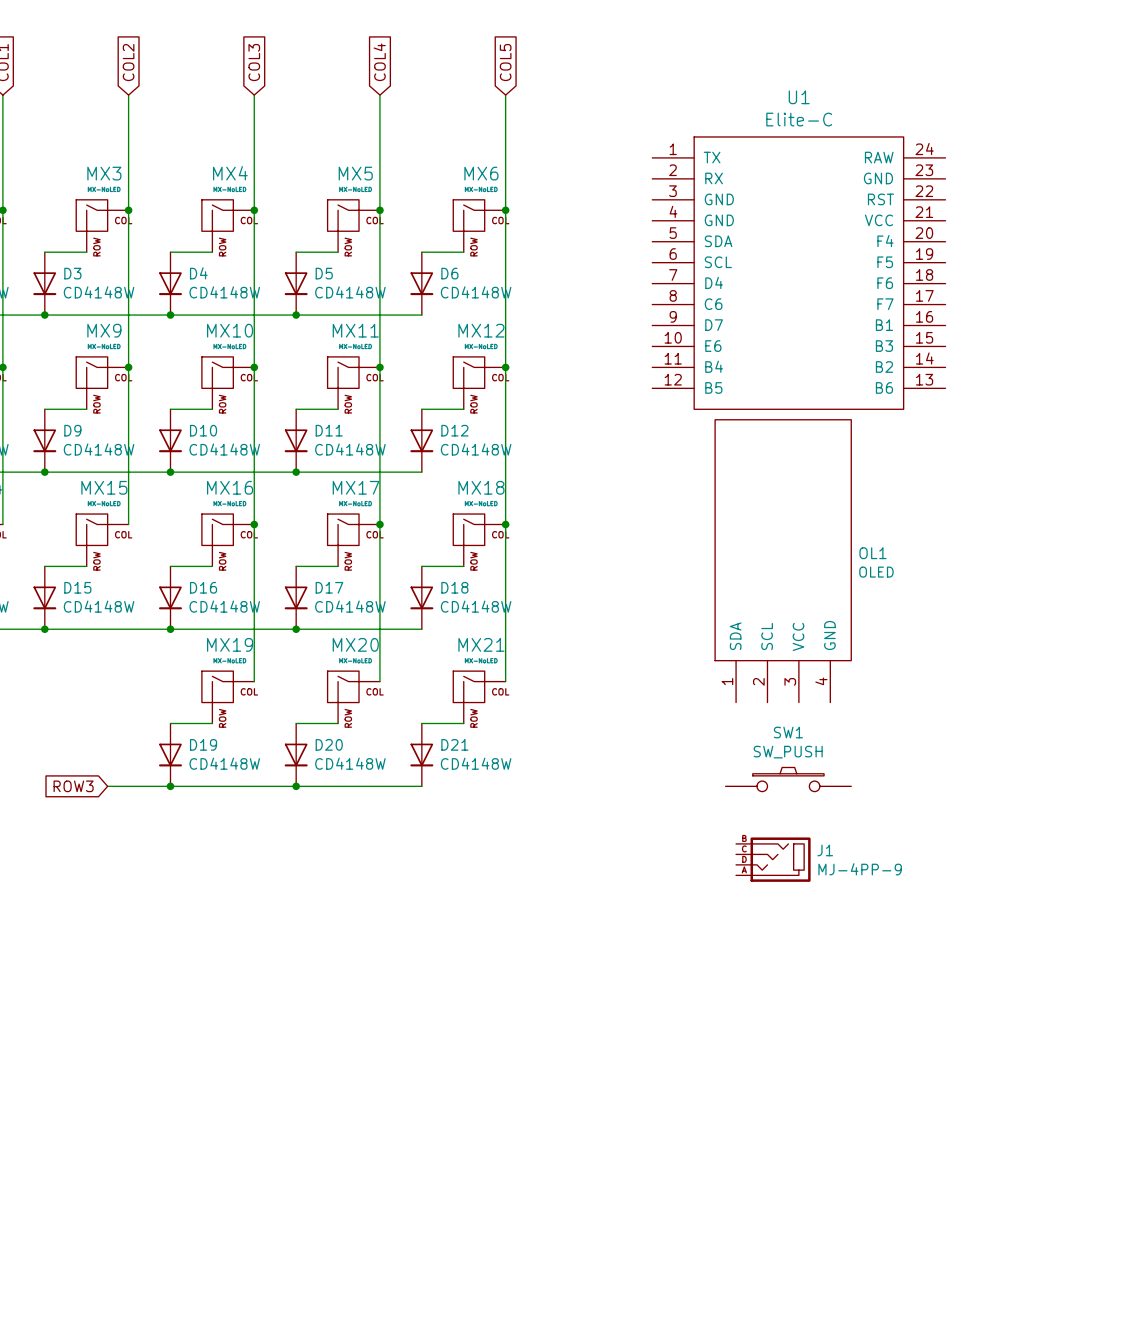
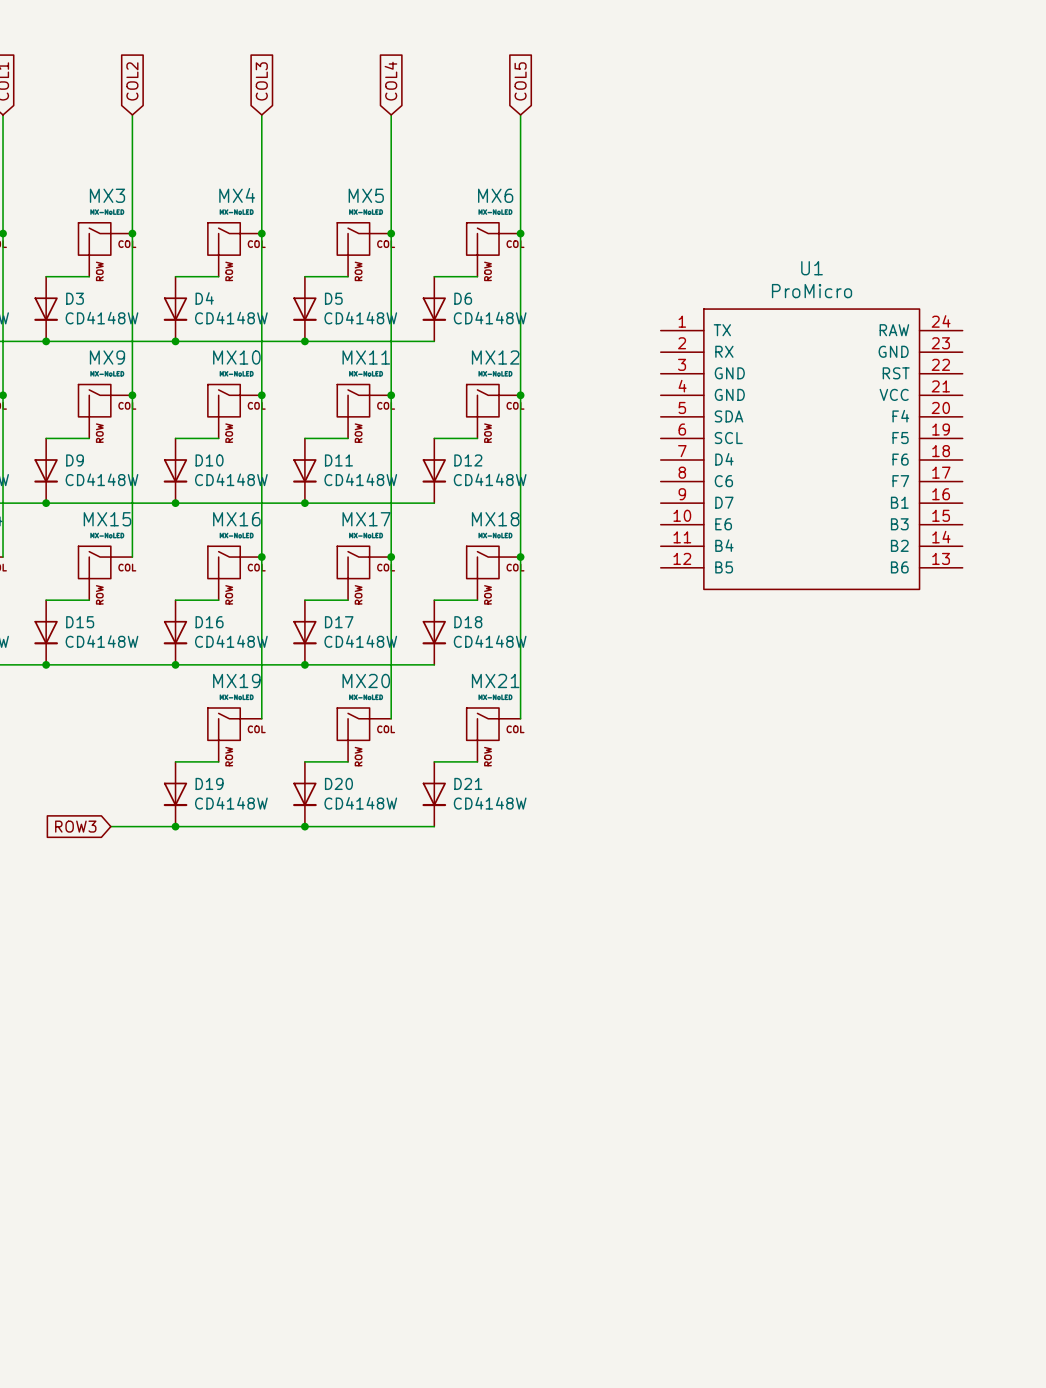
U1 value: Elite-C (799, 119) -> ProMicro (812, 291)
U1 position: (798, 273) -> (811, 449)
OL1: OLED (783, 561) -> none
SW1: SW_PUSH (788, 779) -> none
J1: MJ-4PP-9 (773, 859) -> none

